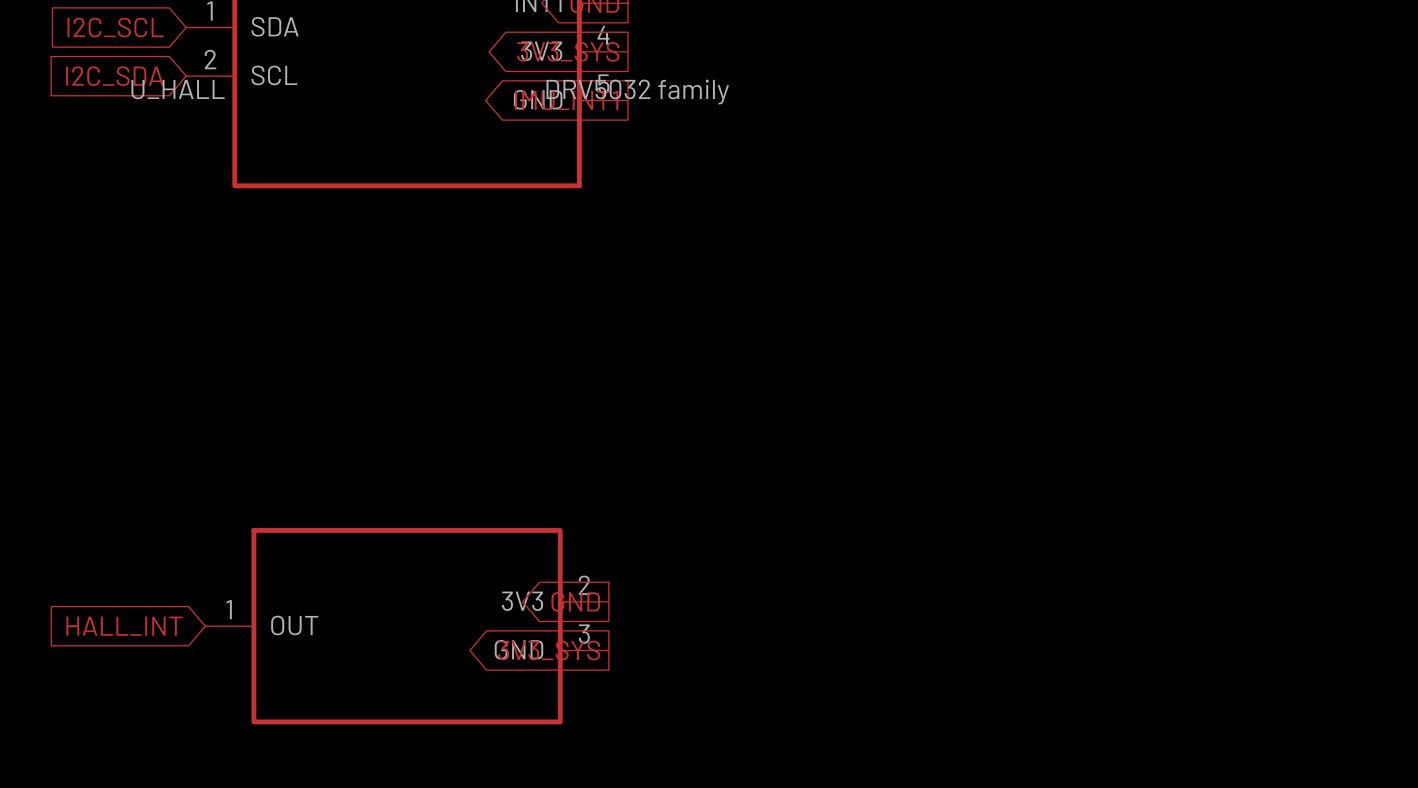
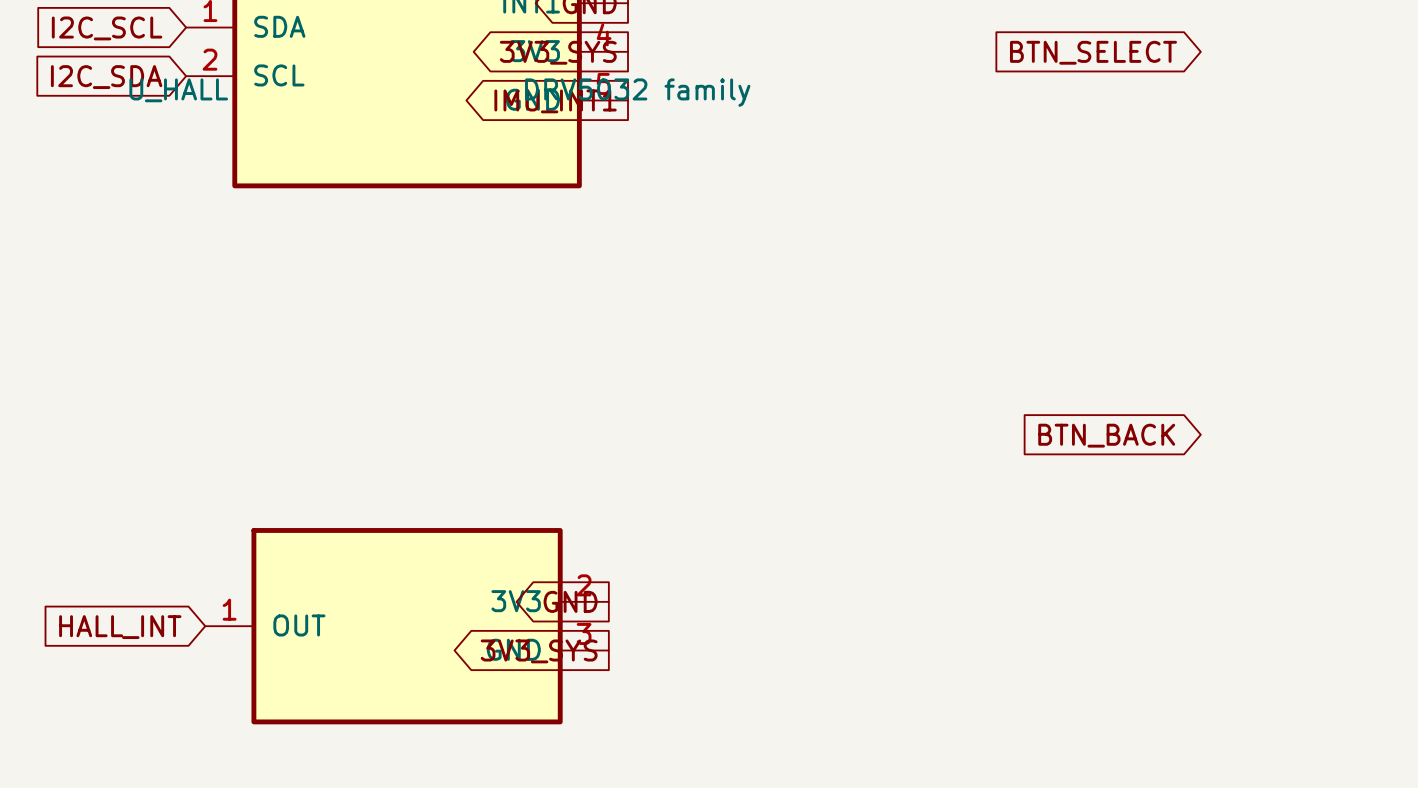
global label: none -> BTN_SELECT (1093, 52)
global label: none -> BTN_BACK (1106, 435)

